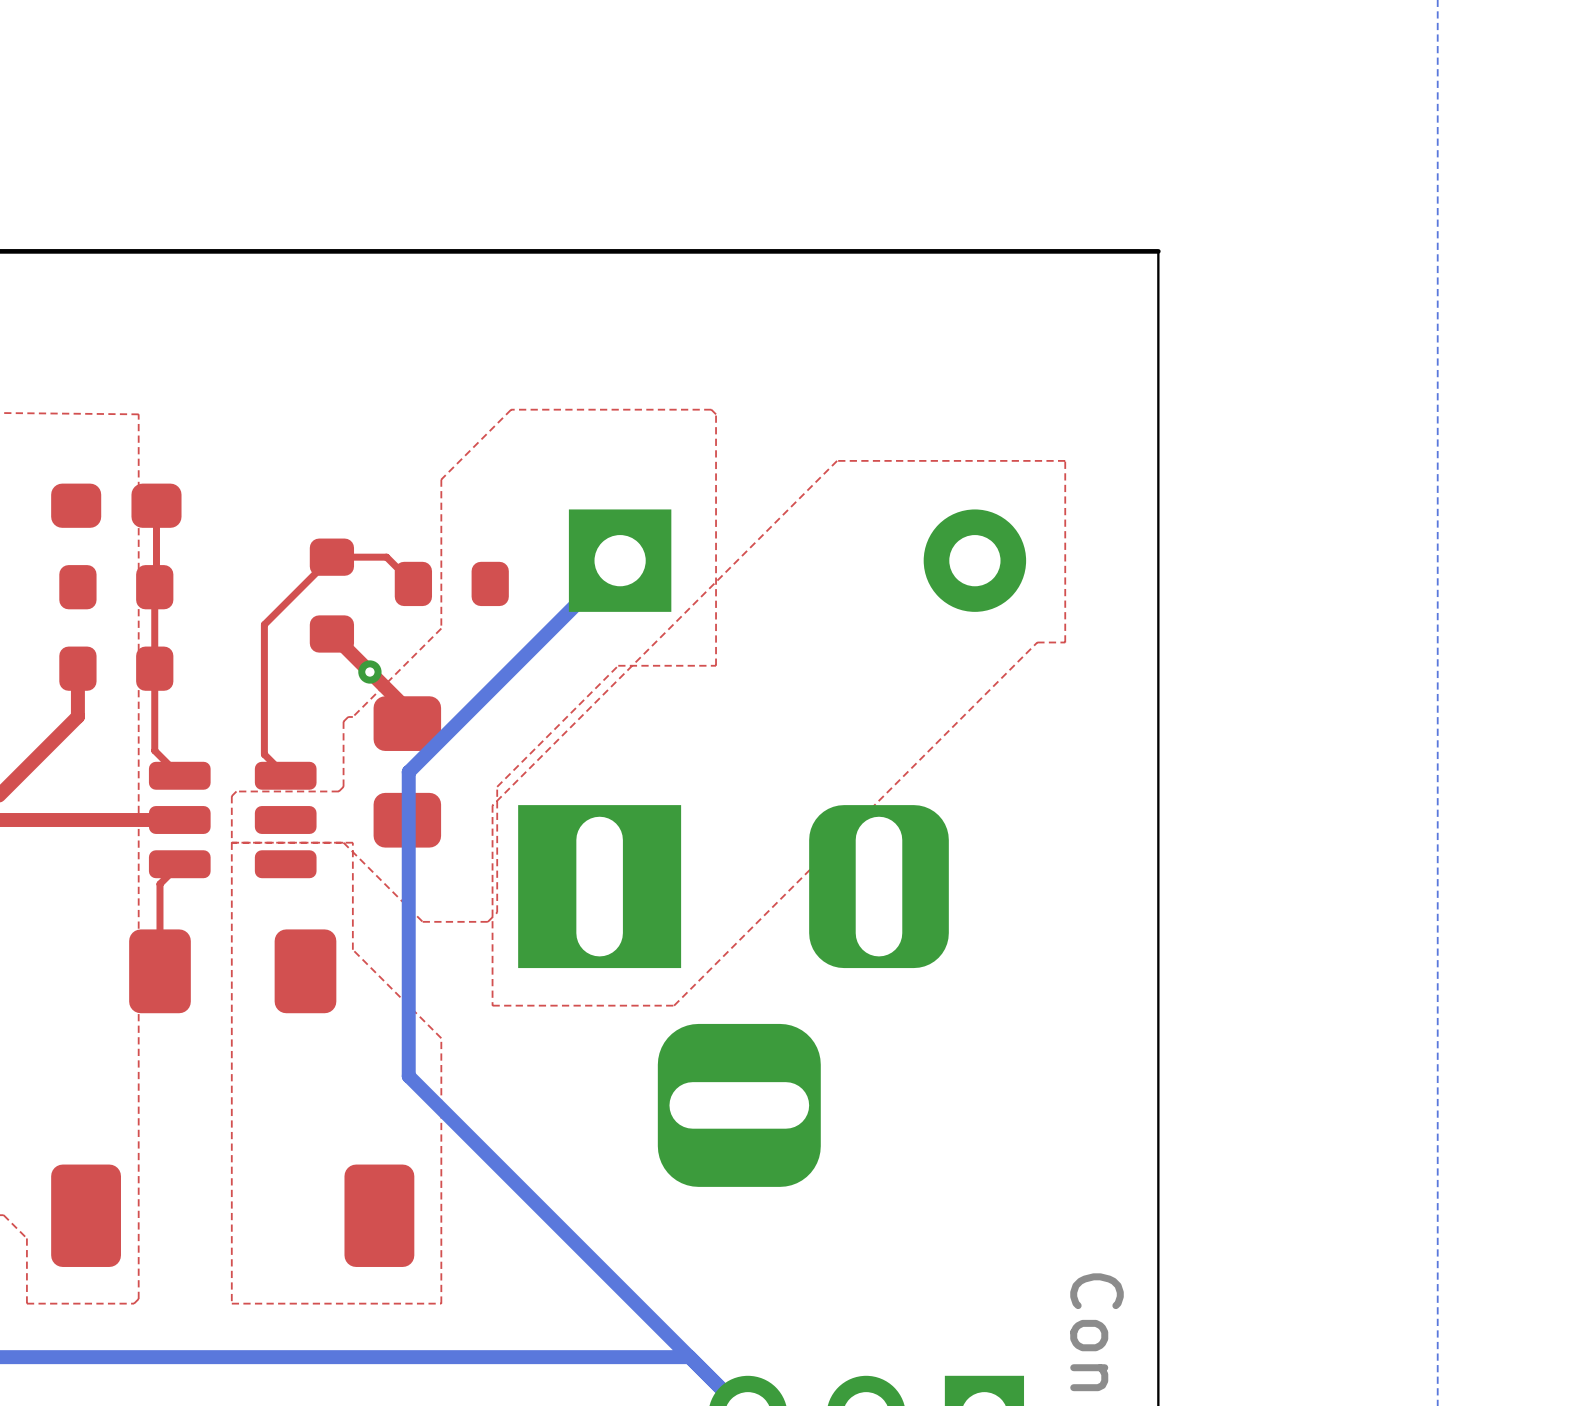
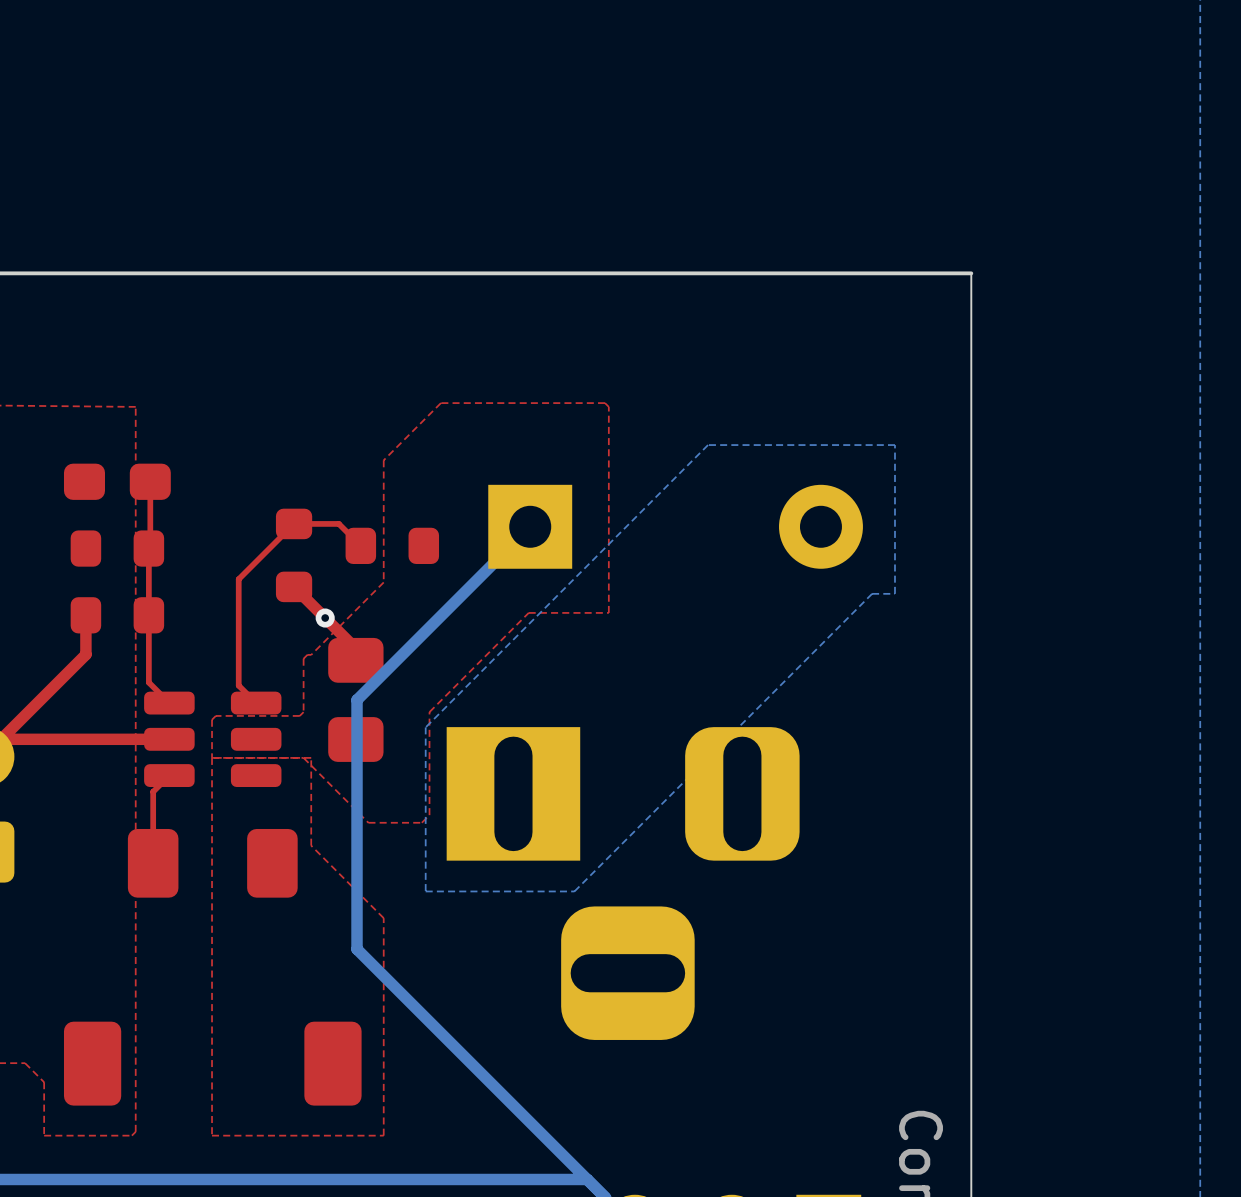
top zone outline: (1065, 460) (837, 460) (492, 805) (492, 1005) (674, 1005) (1037, 642) (1065, 642) (1065, 460) -> none
bottom zone outline: none -> (894, 445) (708, 445) (425, 727) (425, 891) (574, 891) (872, 593) (894, 593) (894, 445)

